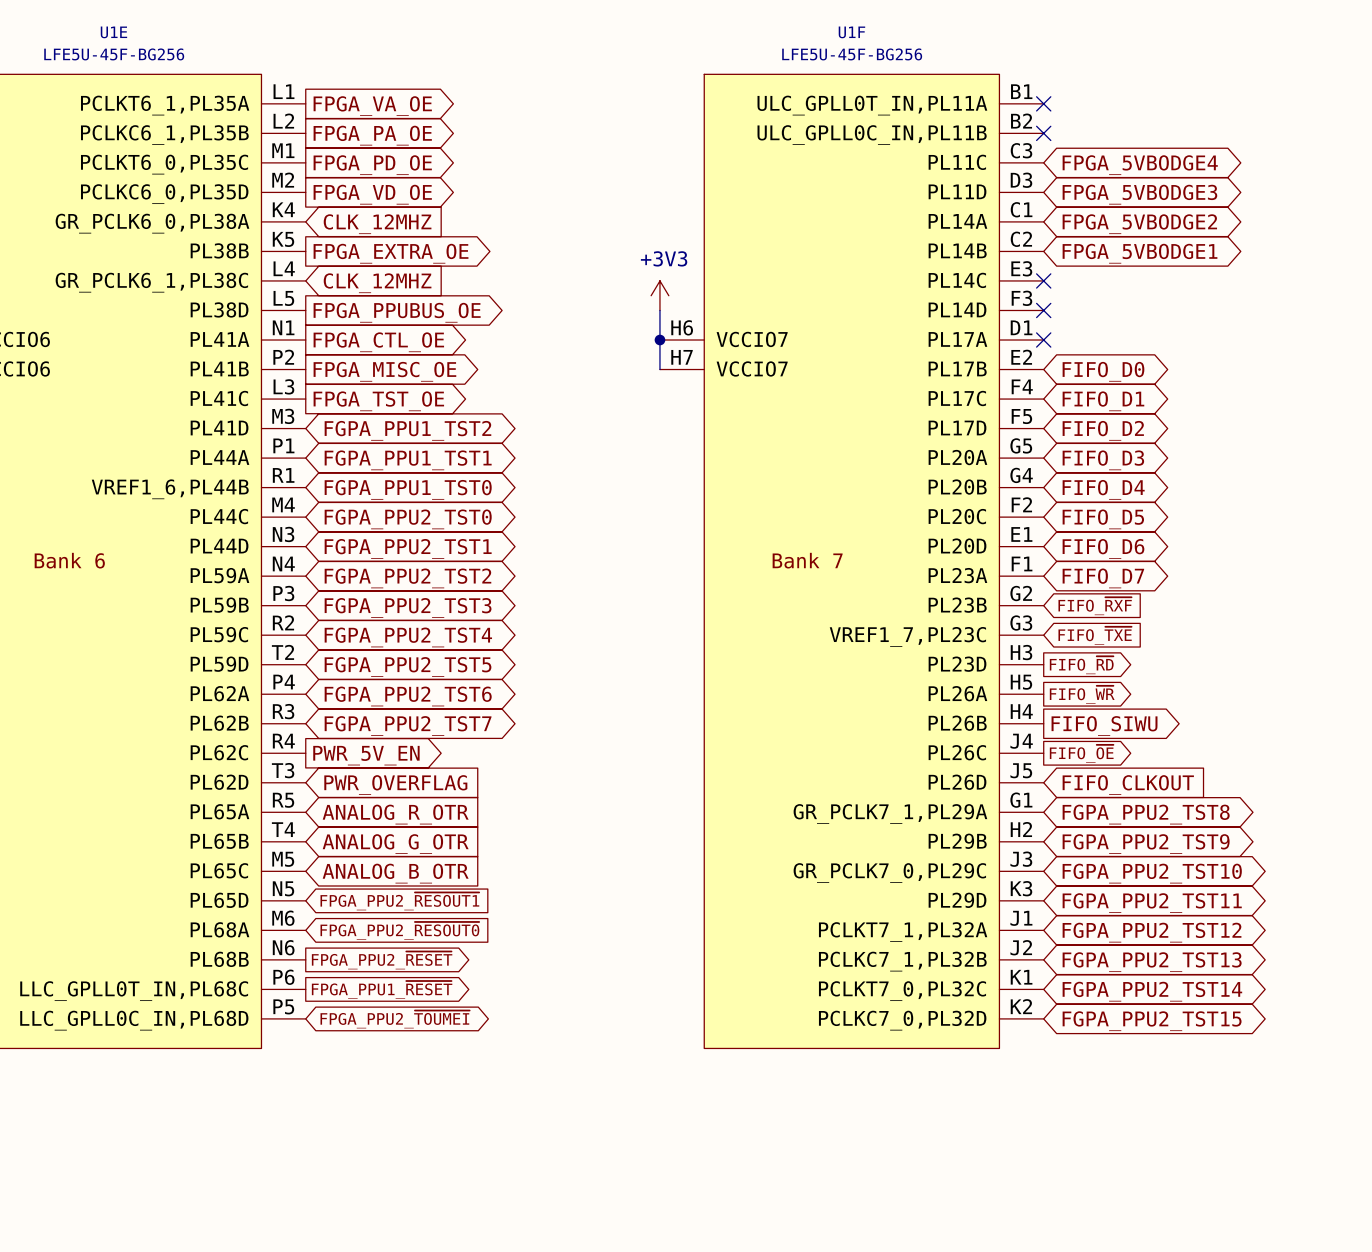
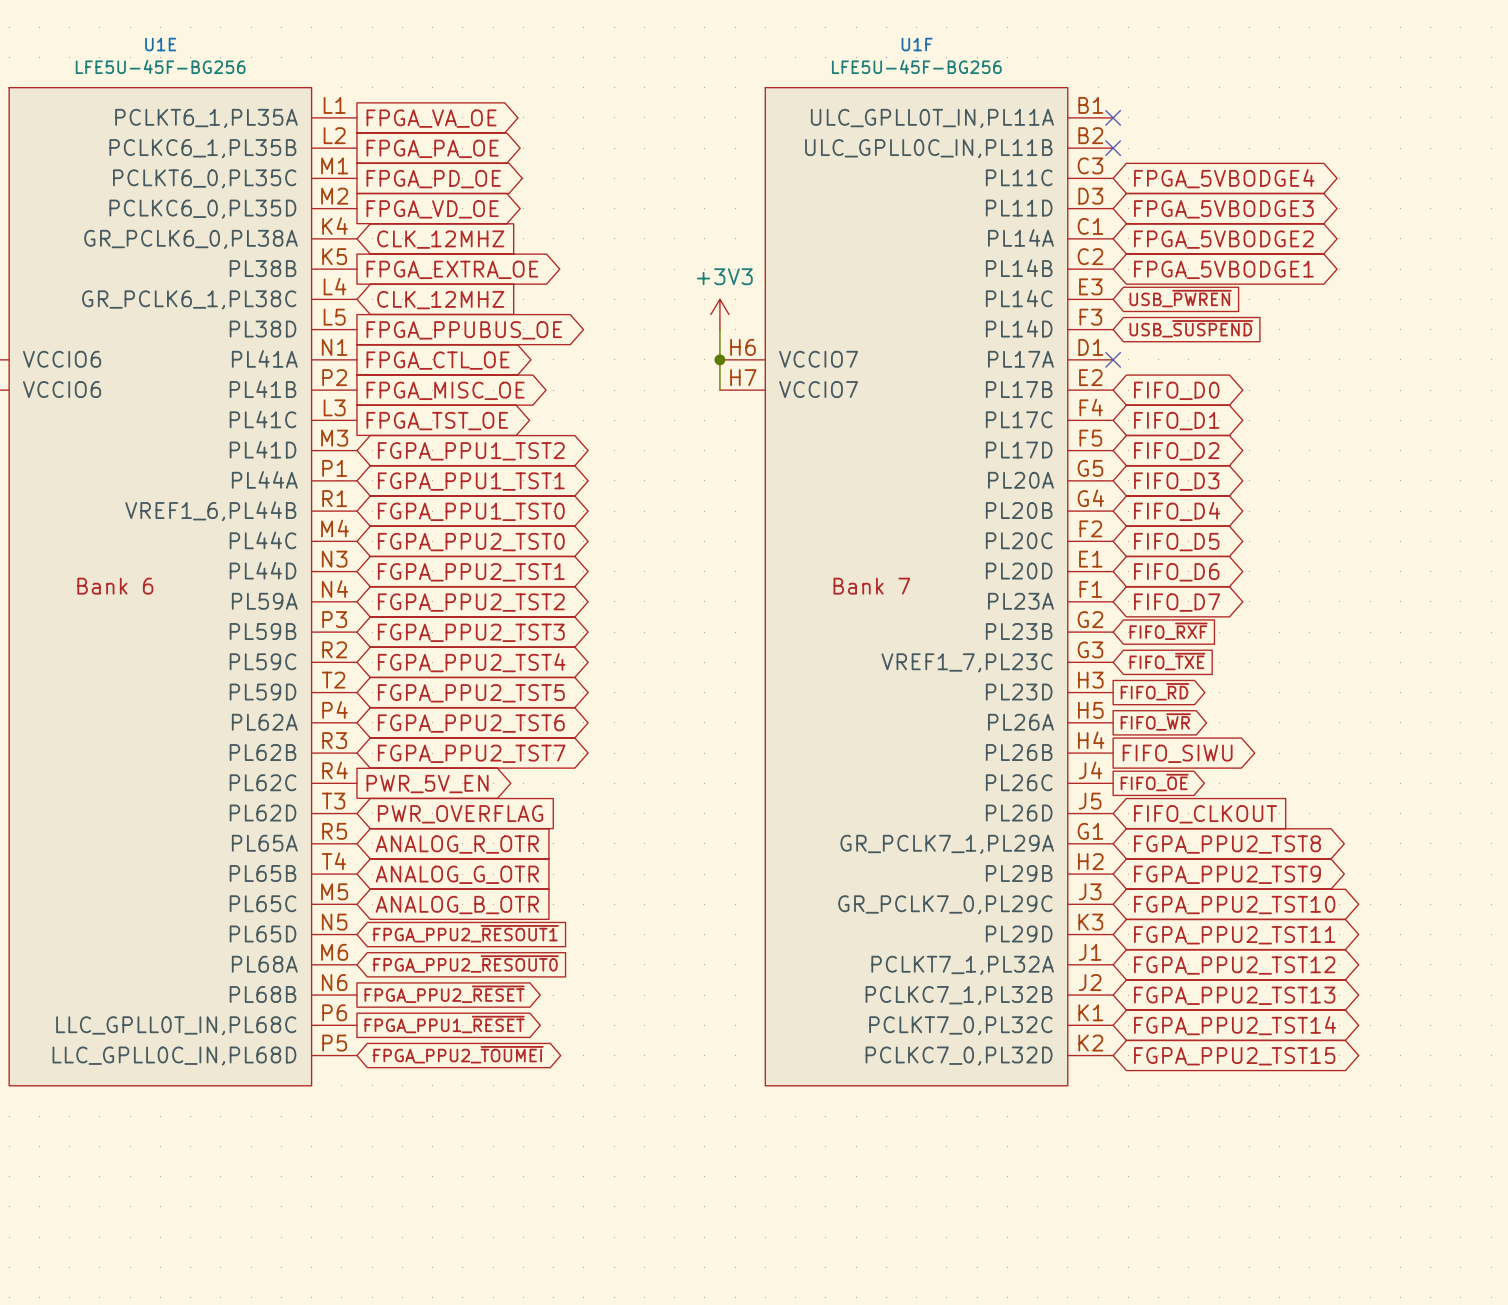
no-connect mark: (1043, 280) -> none
global label: none -> USB_~{PWREN} (1180, 298)
no-connect mark: (1043, 310) -> none
global label: none -> USB_~{SUSPEND} (1191, 328)

